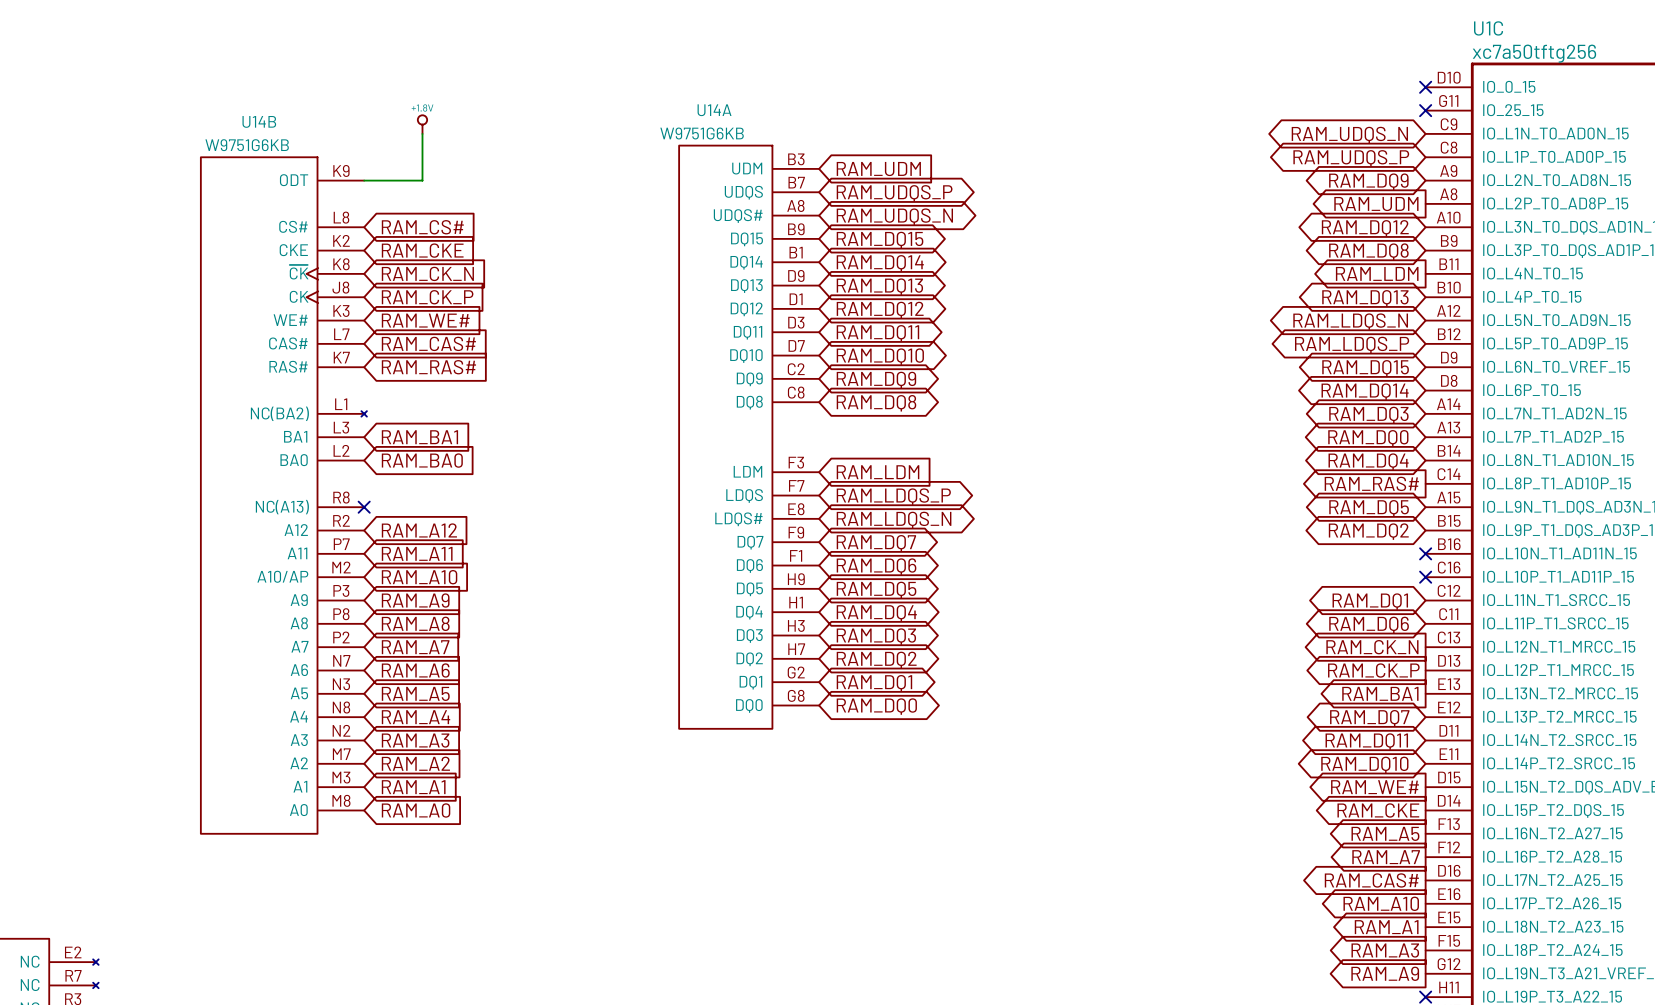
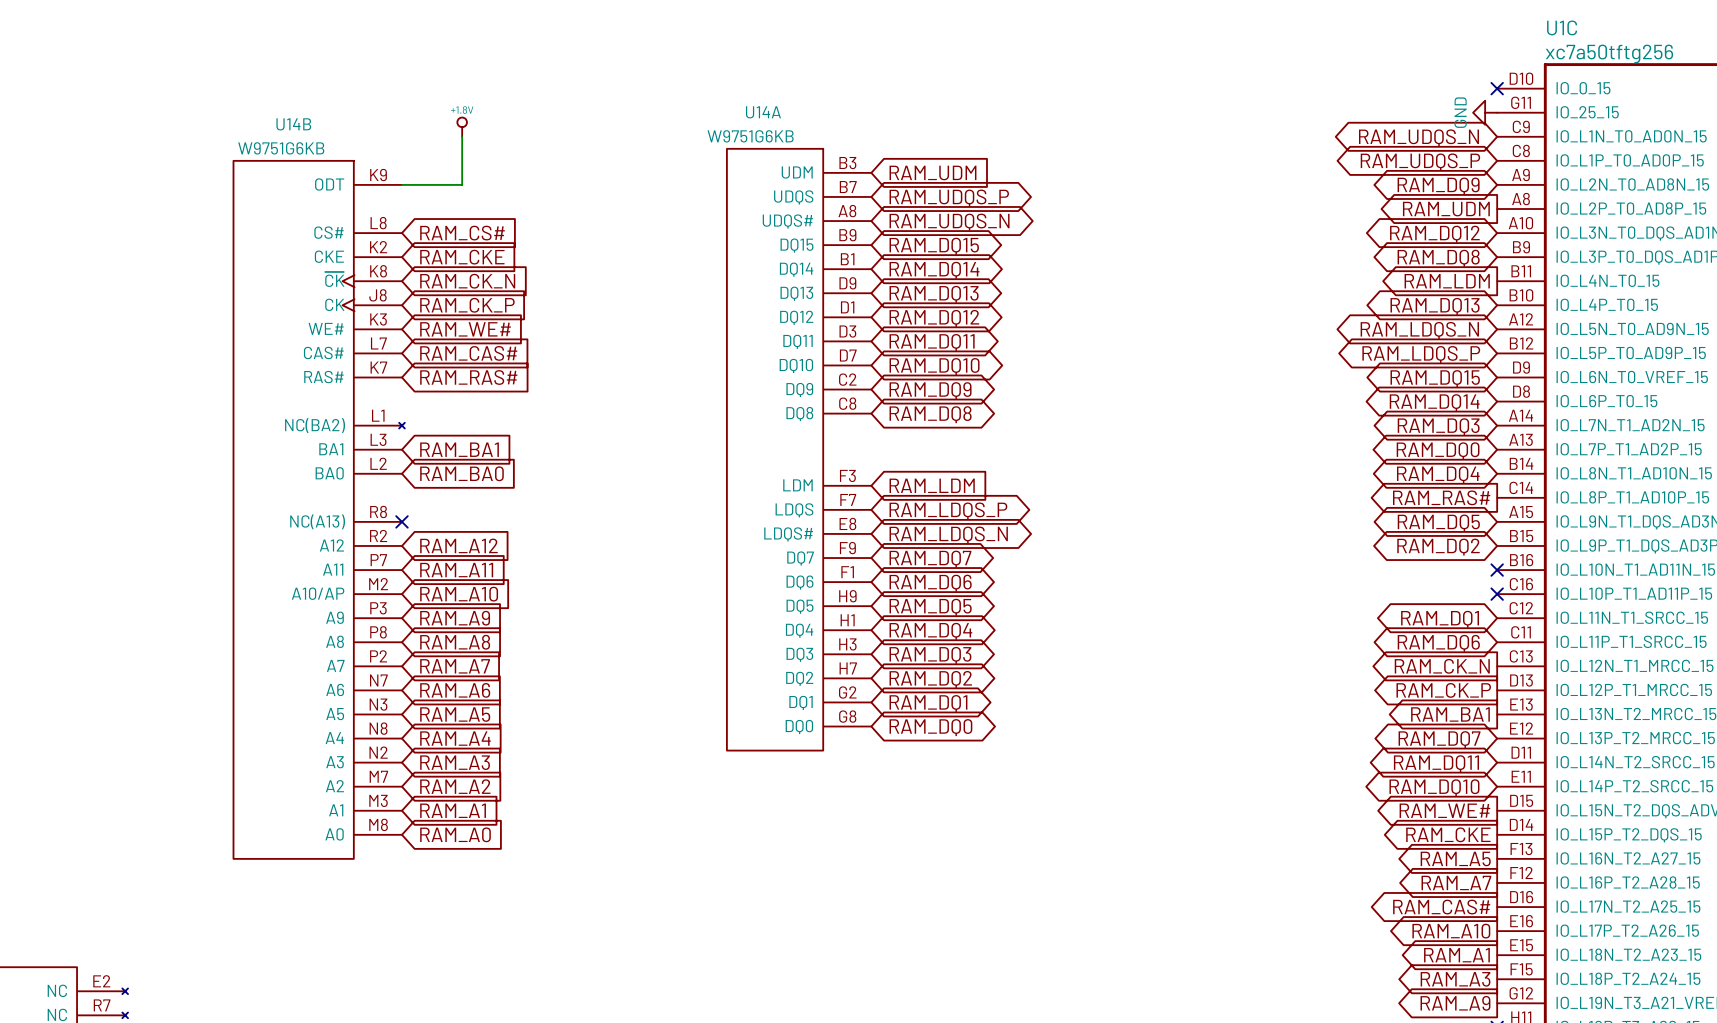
power symbol: none -> GND (1485, 112)
no-connect mark: (1425, 110) -> none

